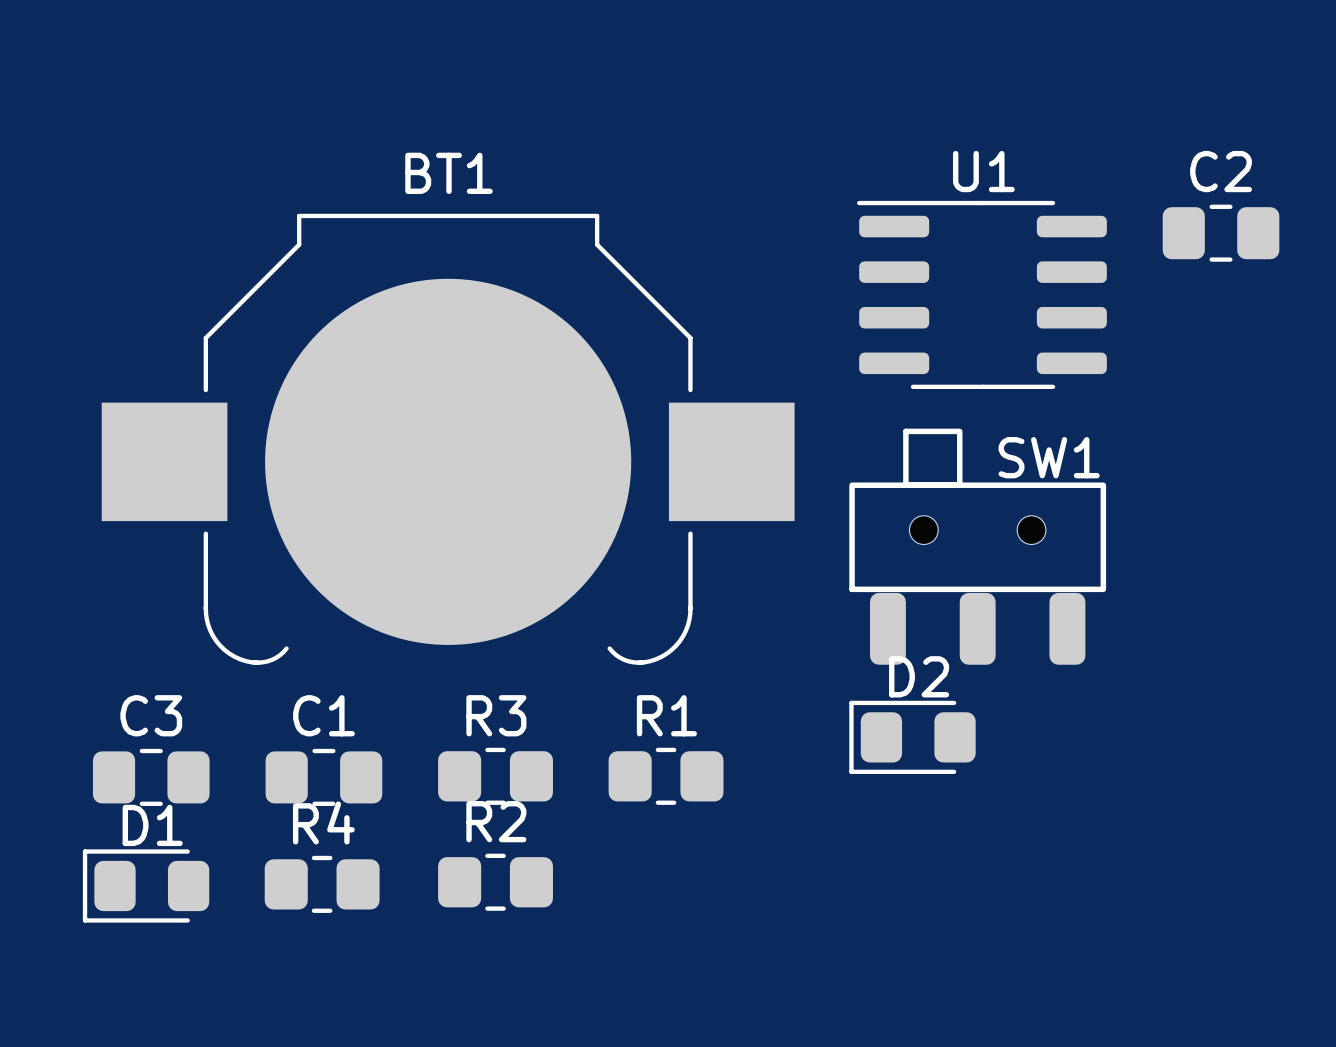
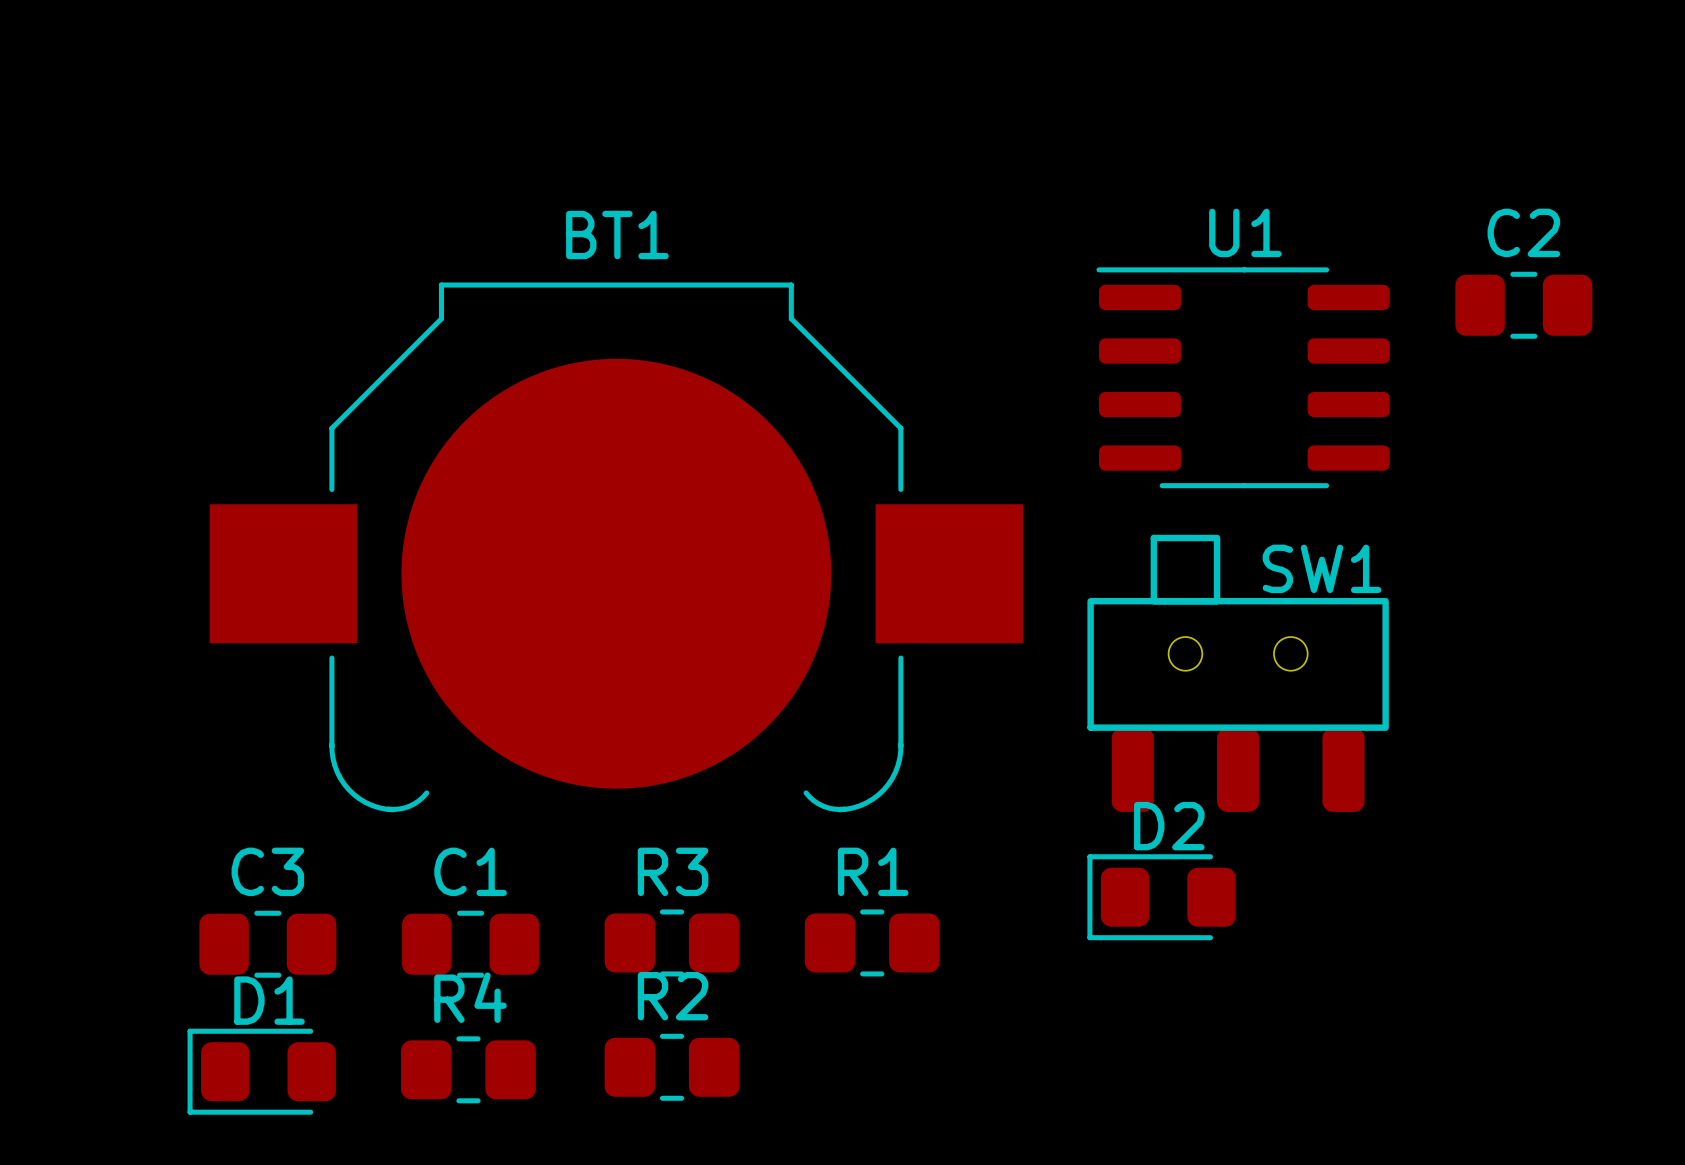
SW1 footprint: [849, 428, 1107, 665] -> [1087, 534, 1389, 812]

